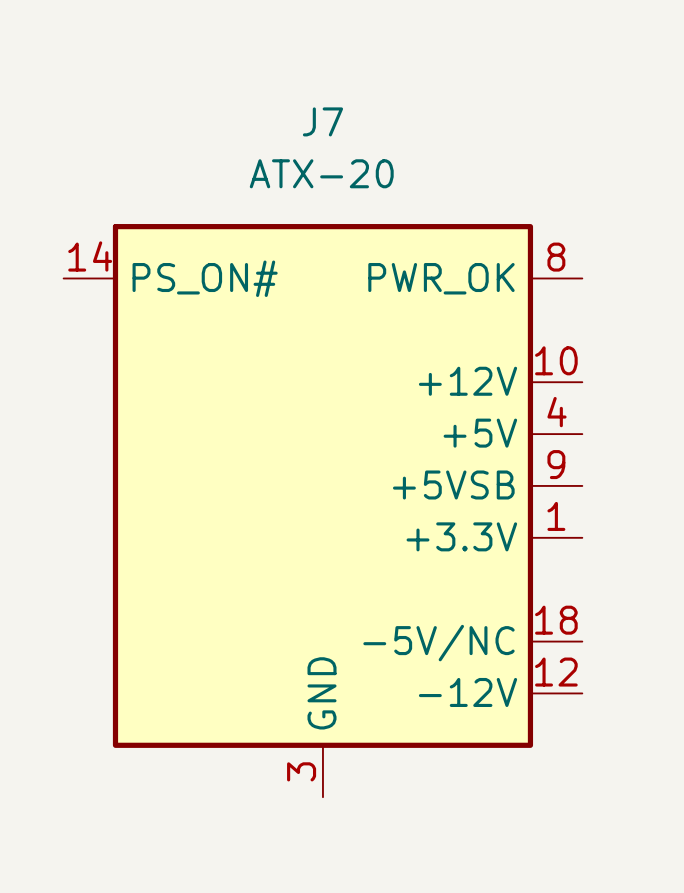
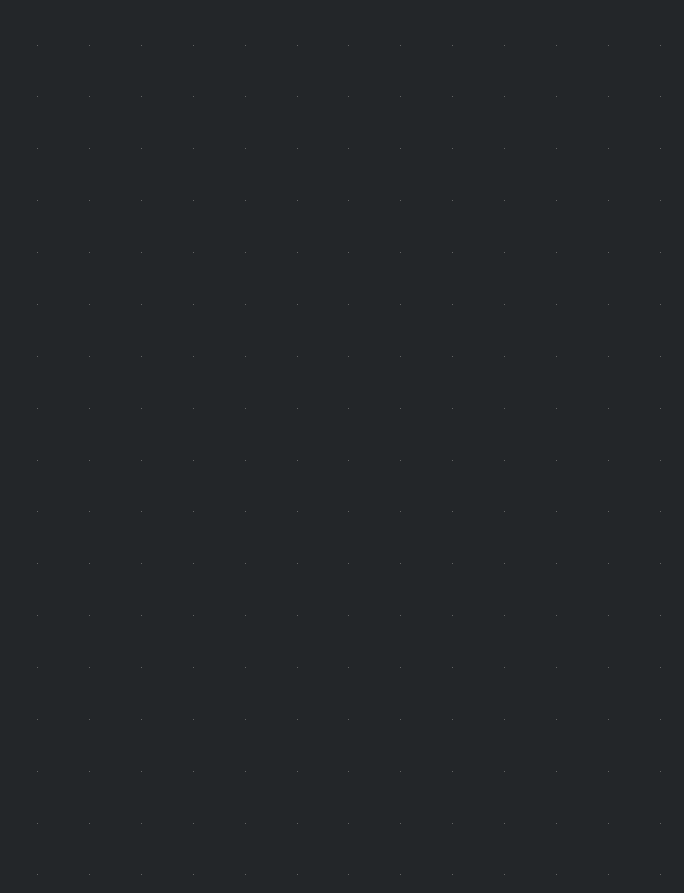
J7: ATX-20 (322, 510) -> none

